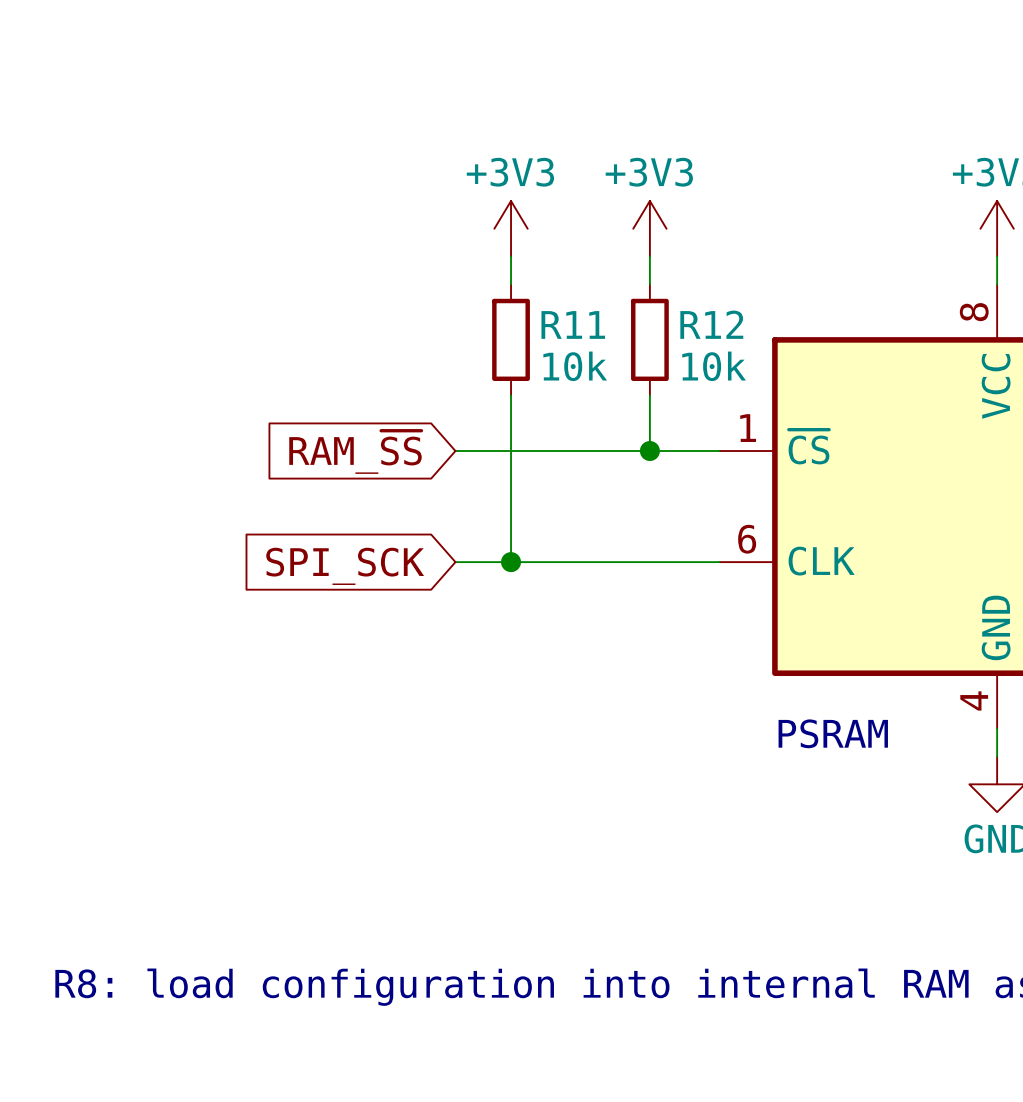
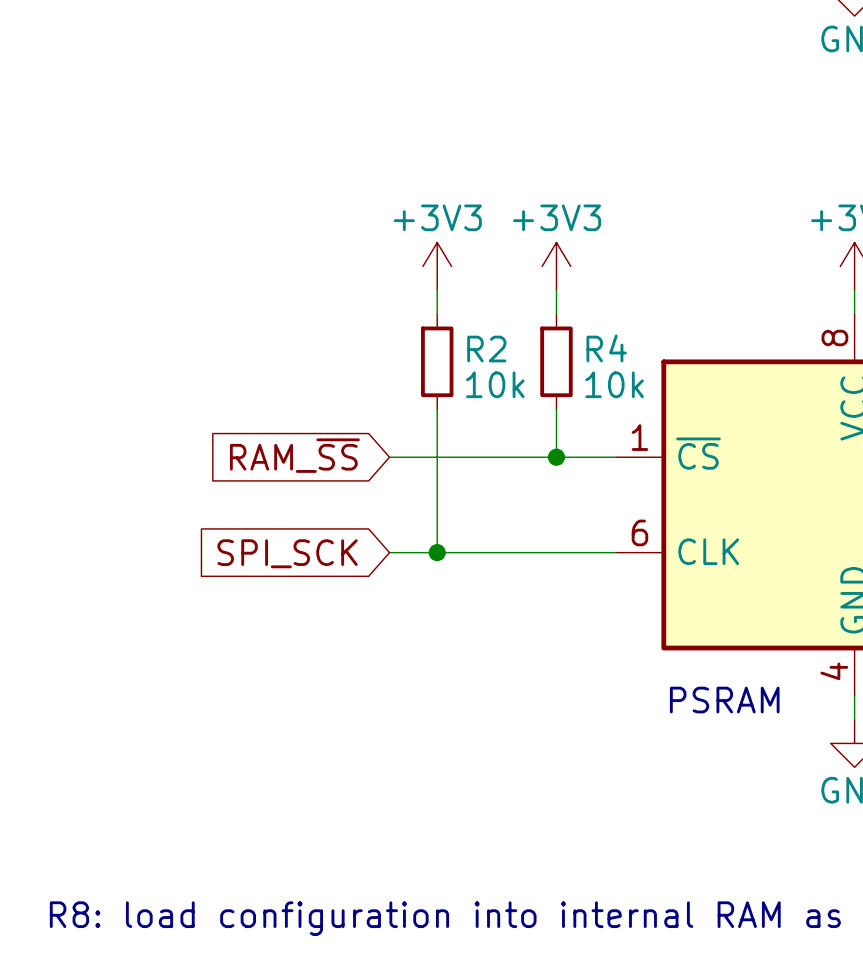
R11 name: R11 (573, 324) -> R2 (486, 349)
R12 name: R12 (711, 324) -> R4 (606, 348)

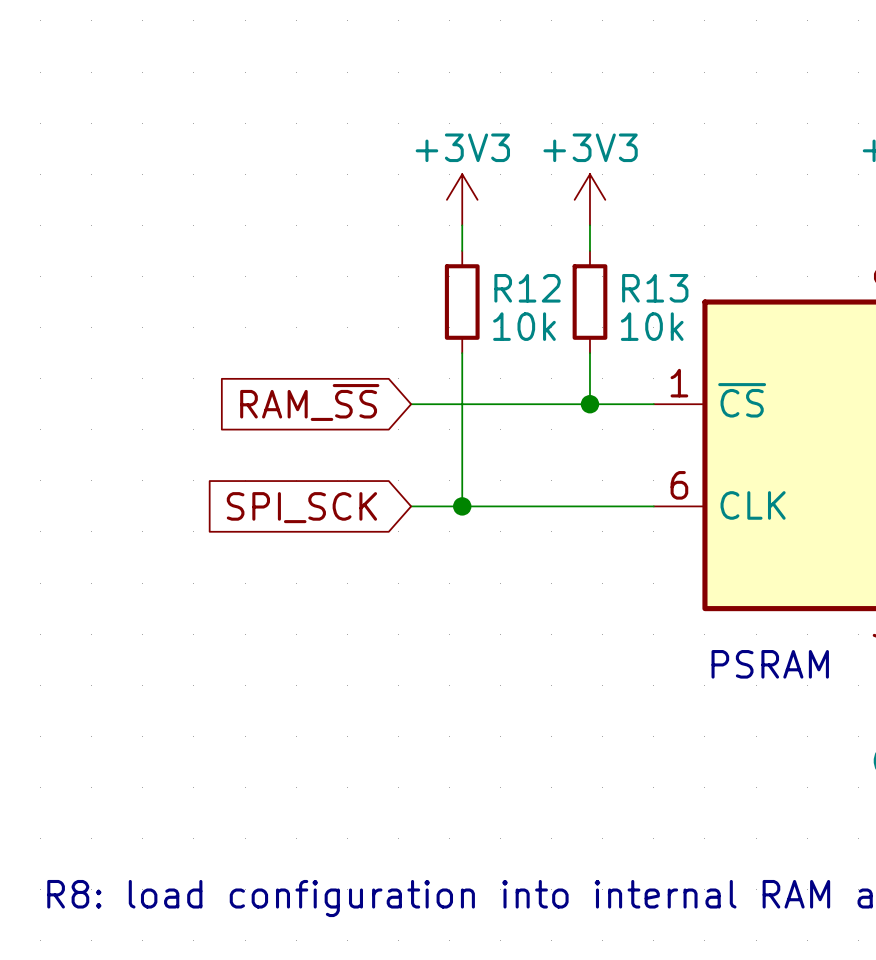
R4 name: R4 (606, 348) -> R13 (655, 288)
R2 name: R2 (486, 349) -> R12 (527, 288)

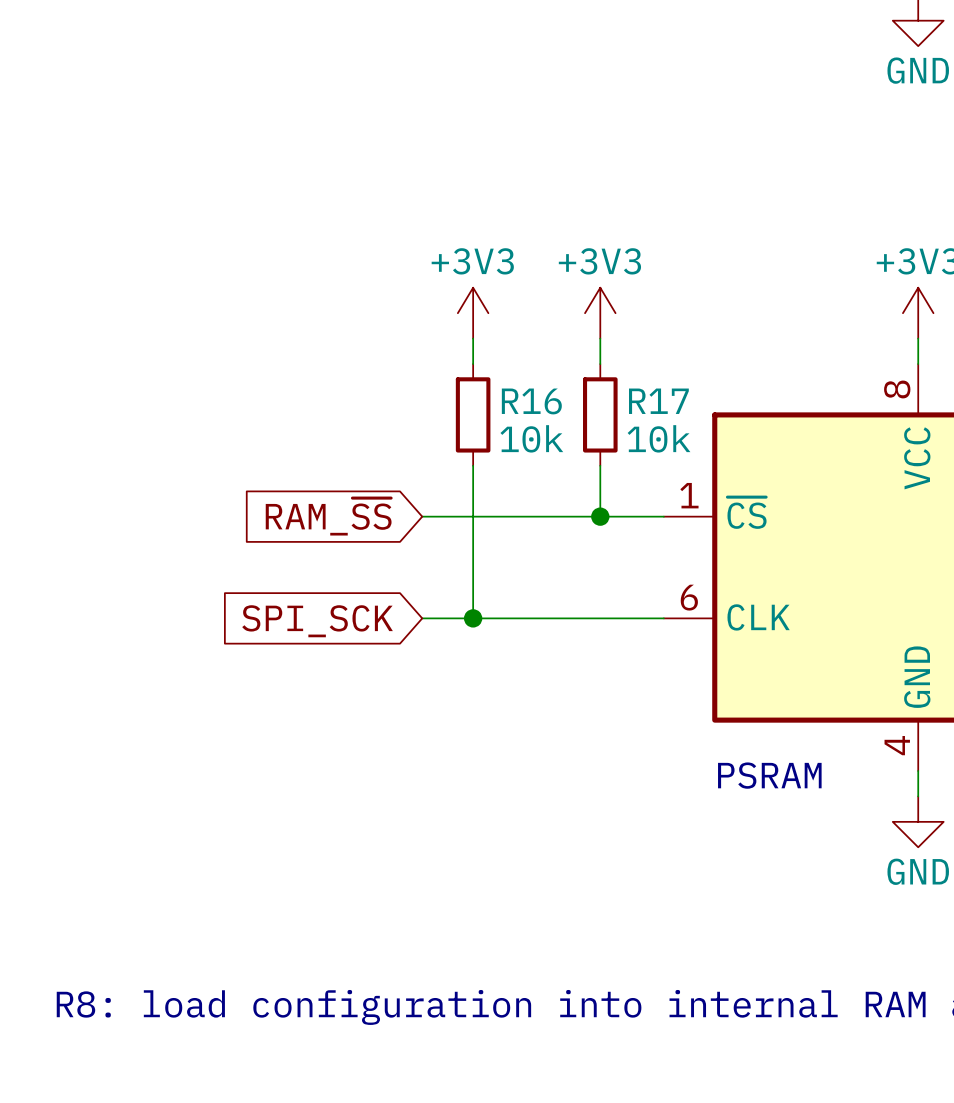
R12 name: R12 (527, 288) -> R16 (531, 401)
R13 name: R13 (655, 288) -> R17 (658, 401)

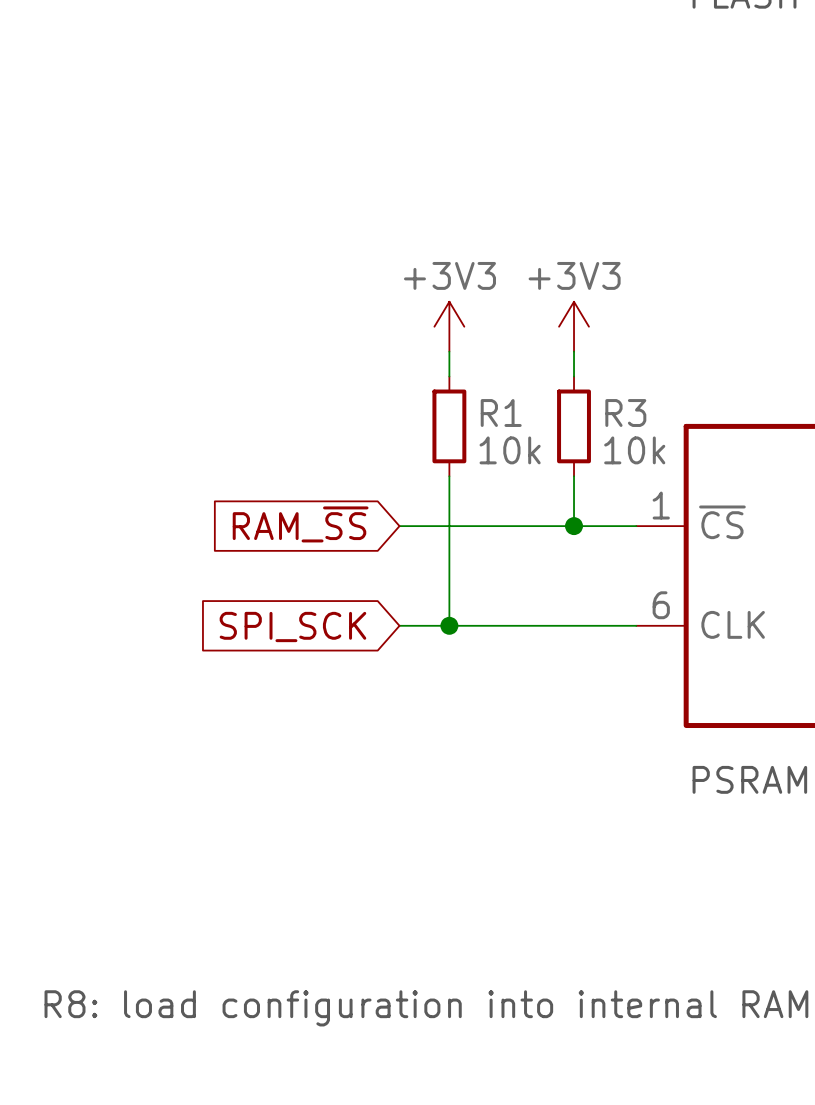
R16 name: R16 (531, 401) -> R1 (501, 413)
R17 name: R17 (658, 401) -> R3 (625, 413)

